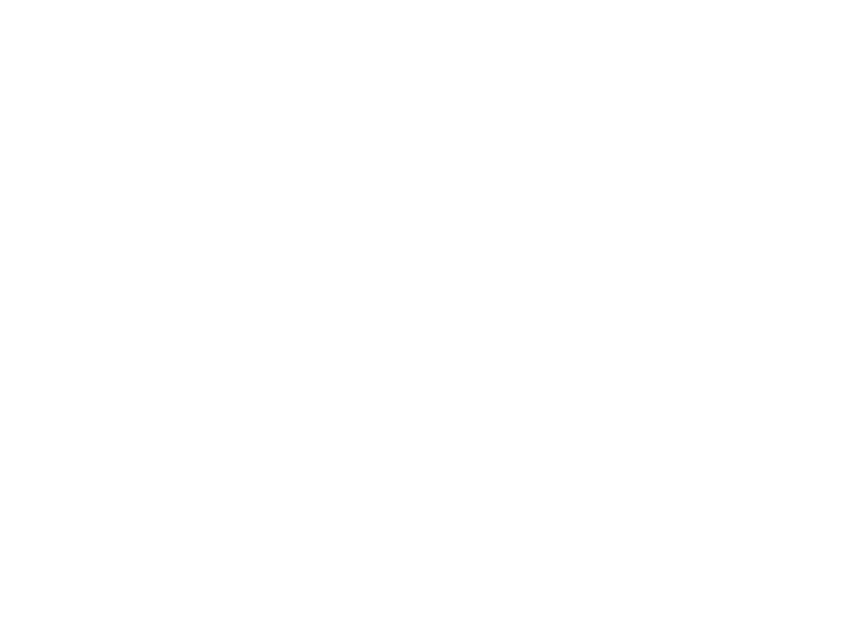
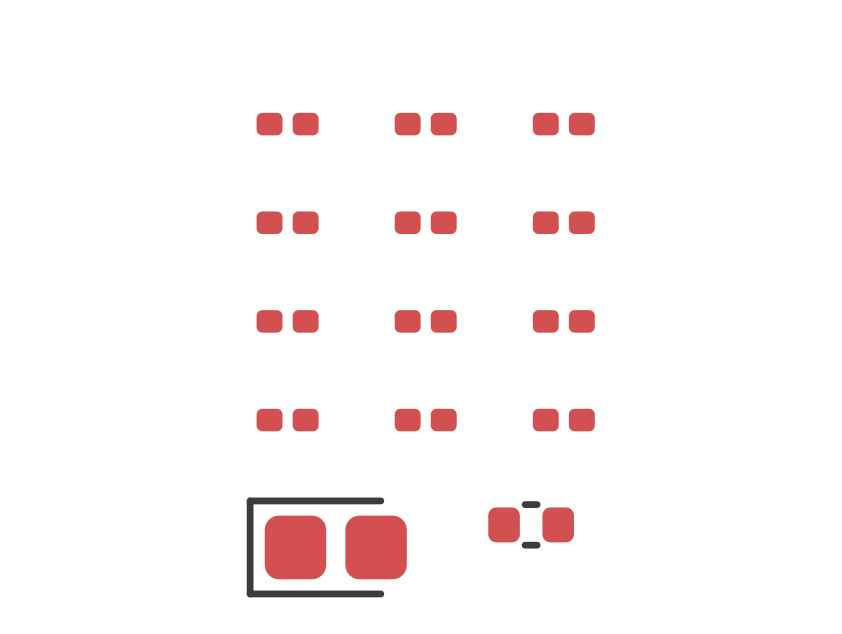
part: none -> (287, 124)
part: none -> (425, 124)
part: none -> (563, 124)
part: none -> (287, 222)
part: none -> (425, 222)
part: none -> (563, 222)
part: none -> (287, 321)
part: none -> (425, 321)
part: none -> (563, 321)
part: none -> (287, 420)
part: none -> (425, 420)
part: none -> (563, 420)
part: none -> (531, 524)
part: none -> (326, 547)

